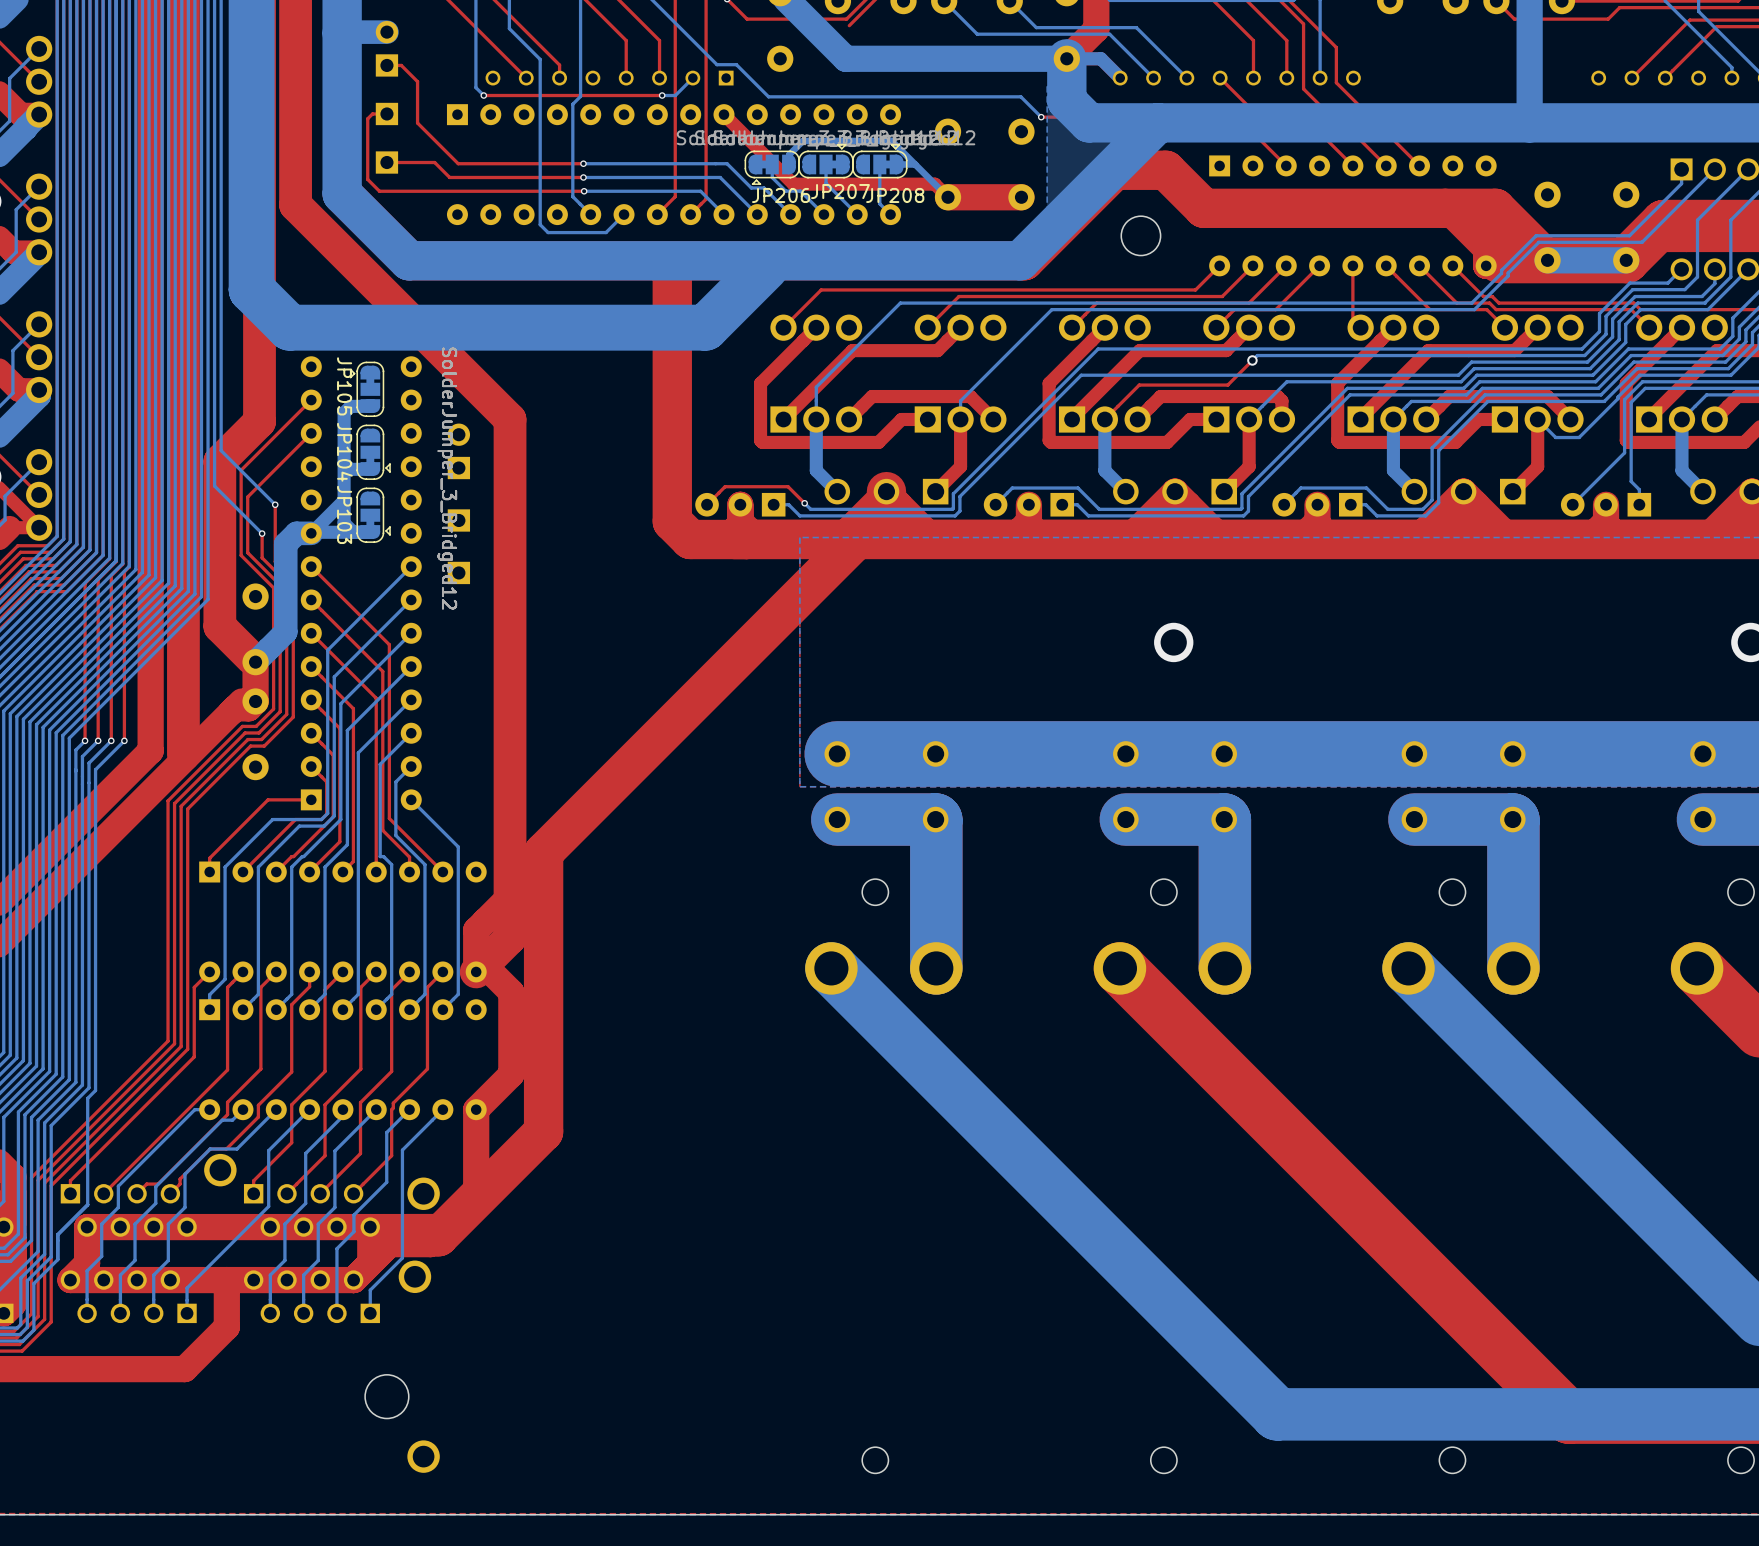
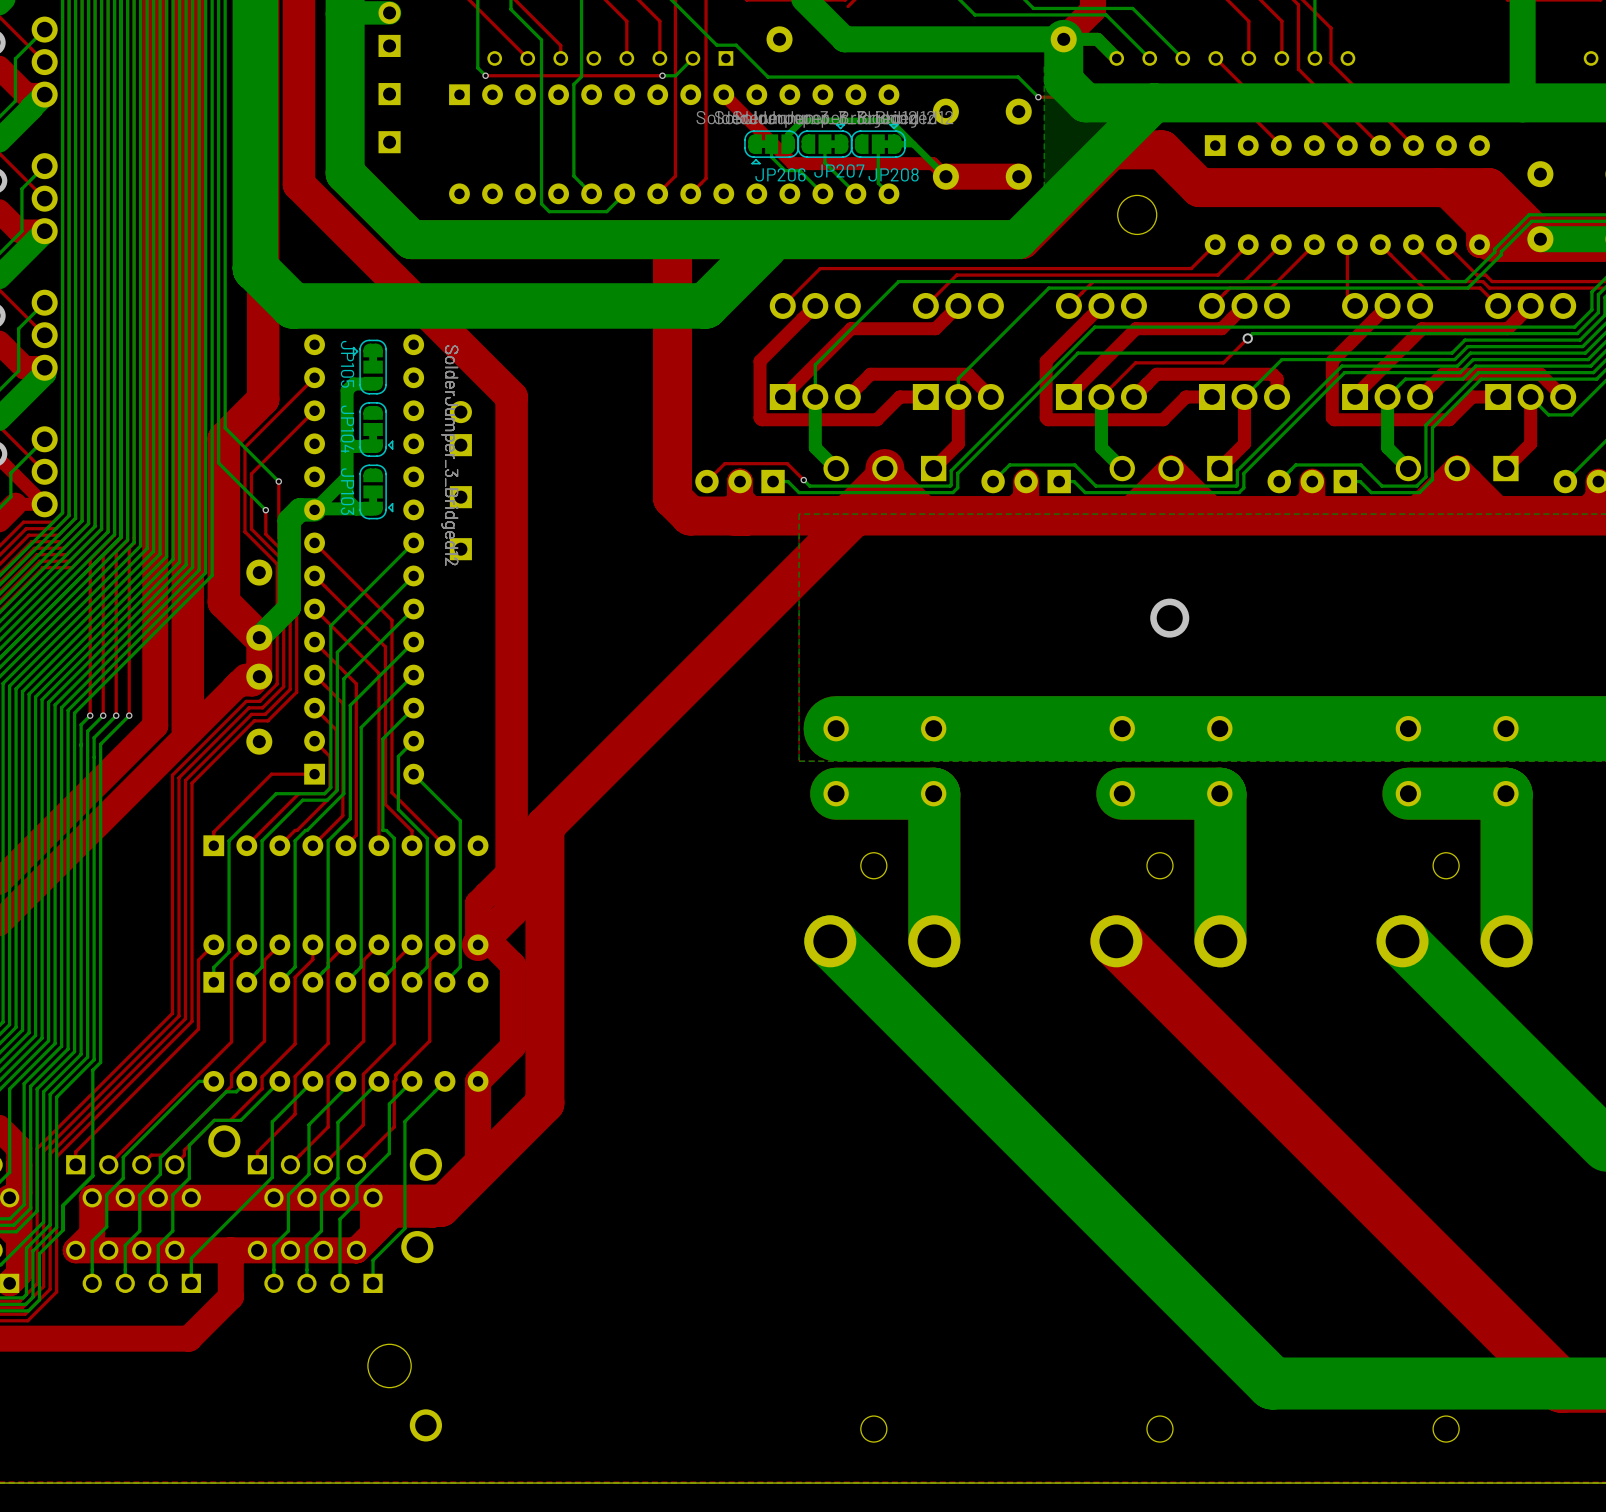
top track: (386, 65) (401, 65) (417, 81) (417, 123) (458, 163) (583, 163) -> none
top track: (386, 113) (372, 113) (367, 118) (367, 179) (379, 191) (584, 191) -> none
top track: (386, 162) (434, 162) (449, 177) (583, 177) -> none
bottom track: (583, 163) (727, 163) (751, 187) (764, 187) (790, 214) -> none
via: (583, 163) -> none
bottom track: (583, 177) (720, 177) (757, 214) -> none
via: (583, 177) -> none
bottom track: (584, 191) (700, 191) (723, 214) -> none
via: (584, 191) -> none

